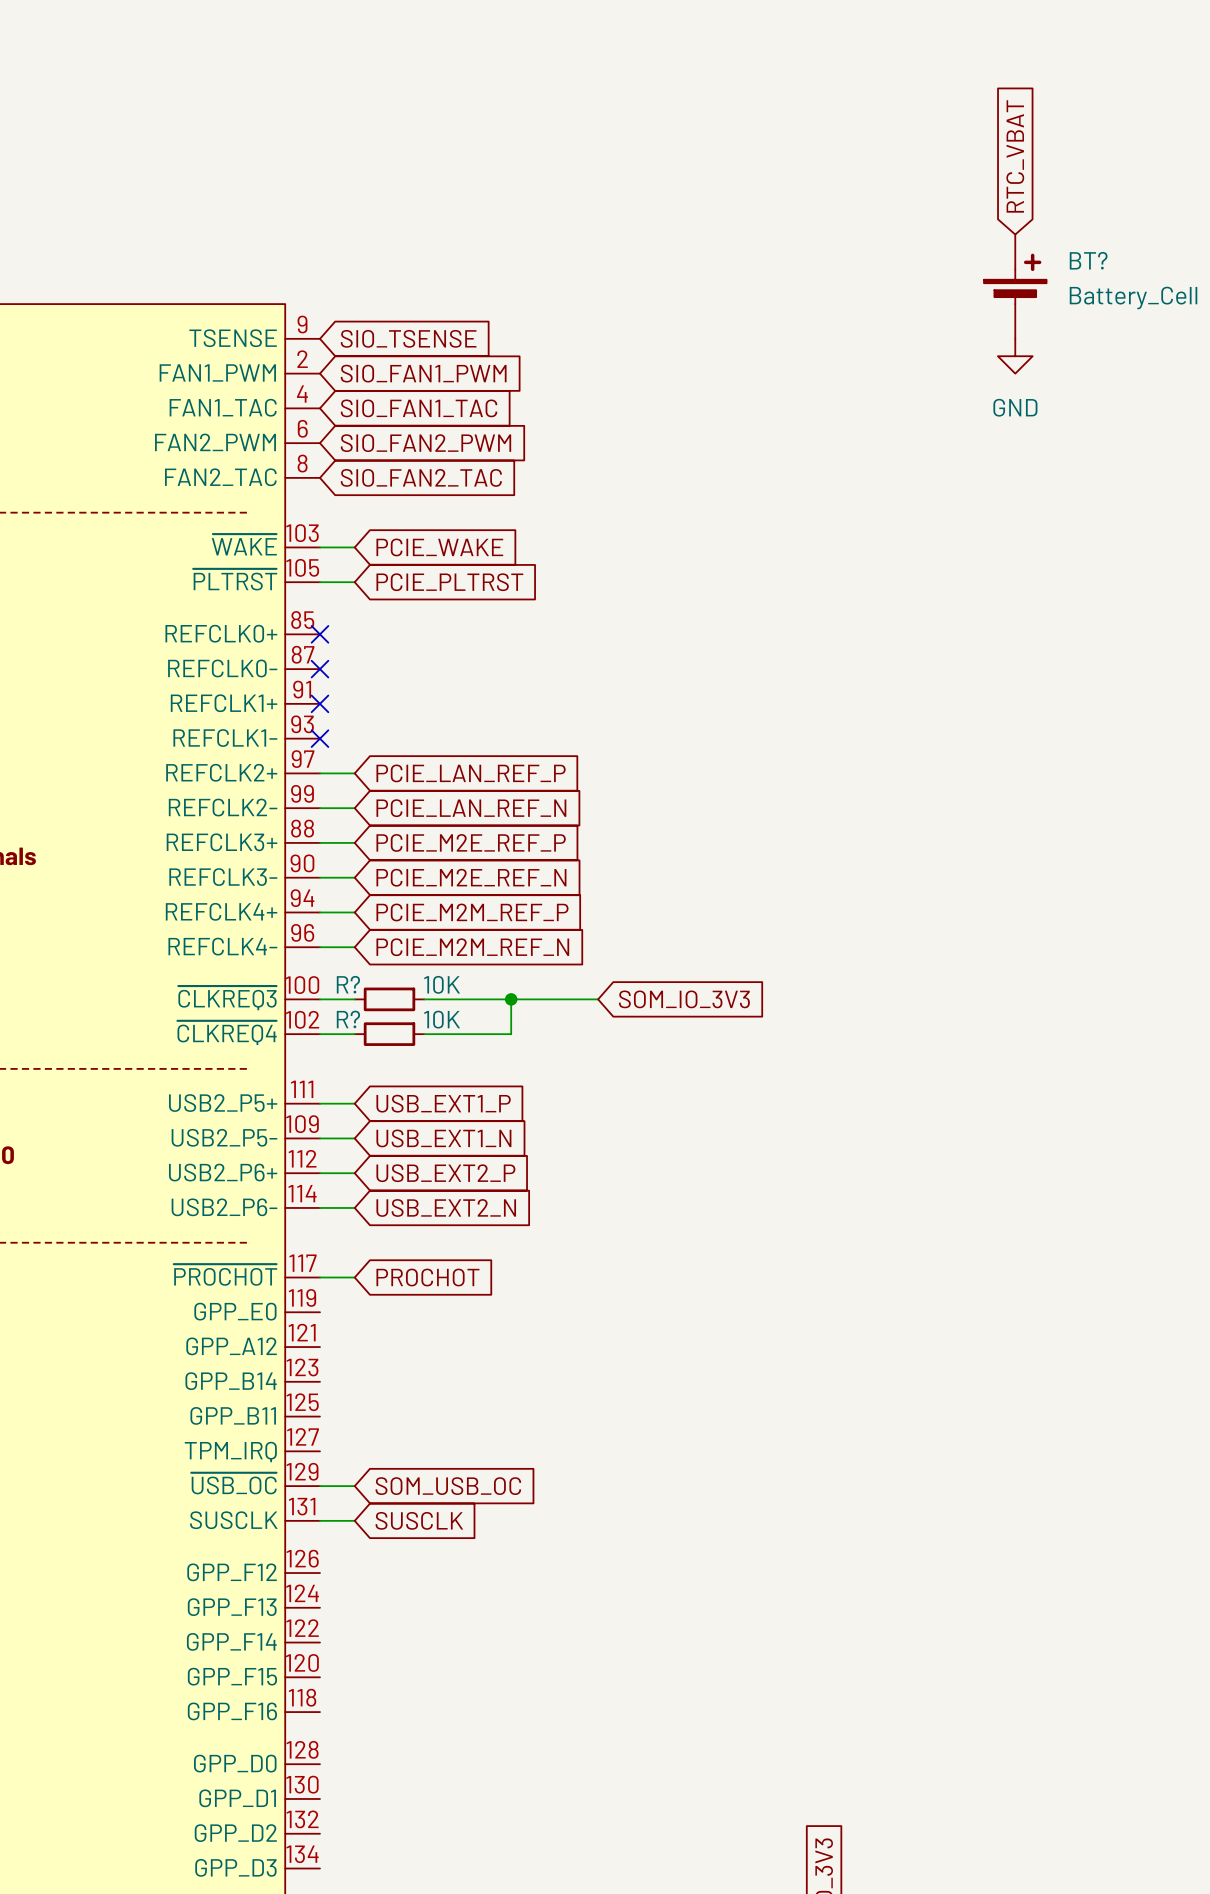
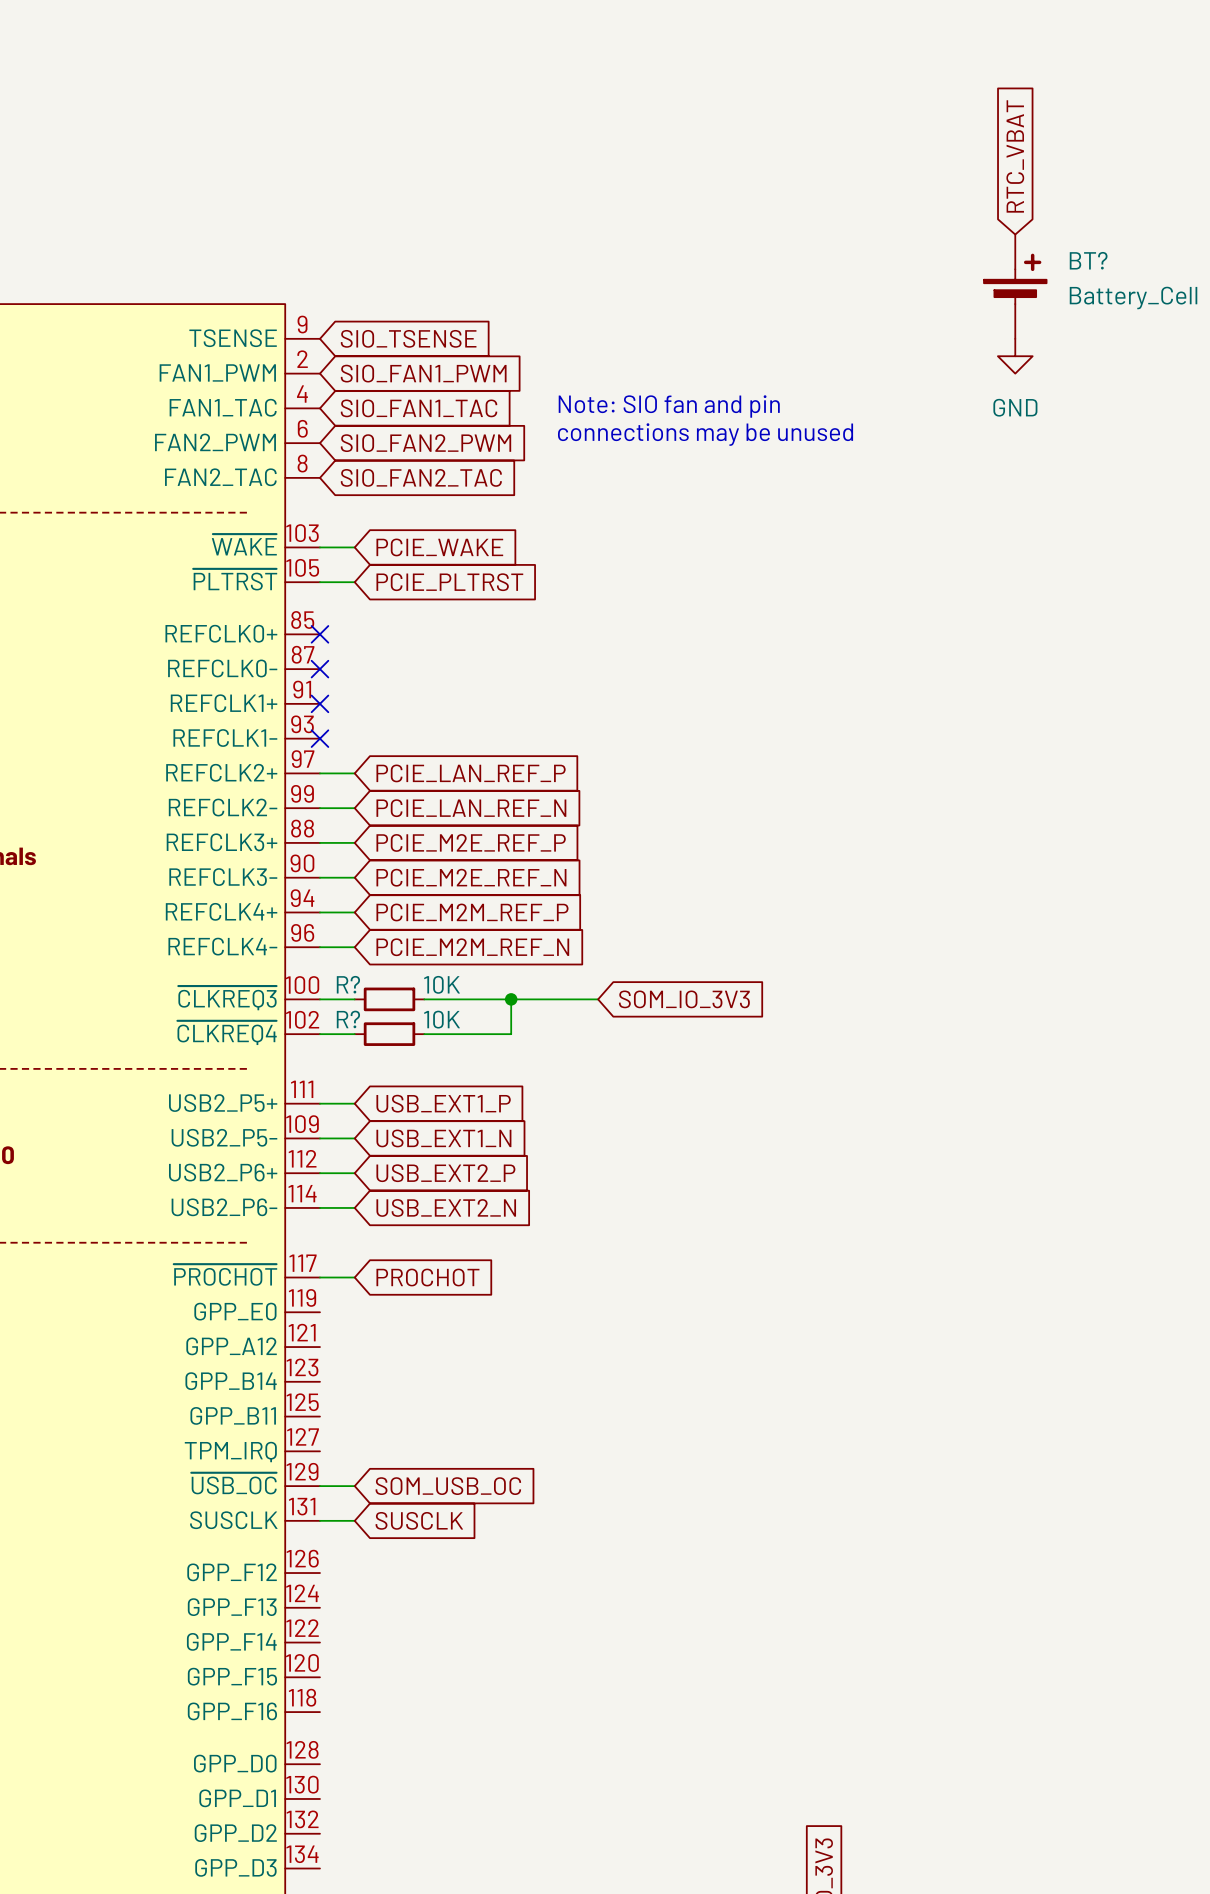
text: none -> Note: SIO fan and pin (669, 406)
text: none -> connections may be unused (705, 434)

